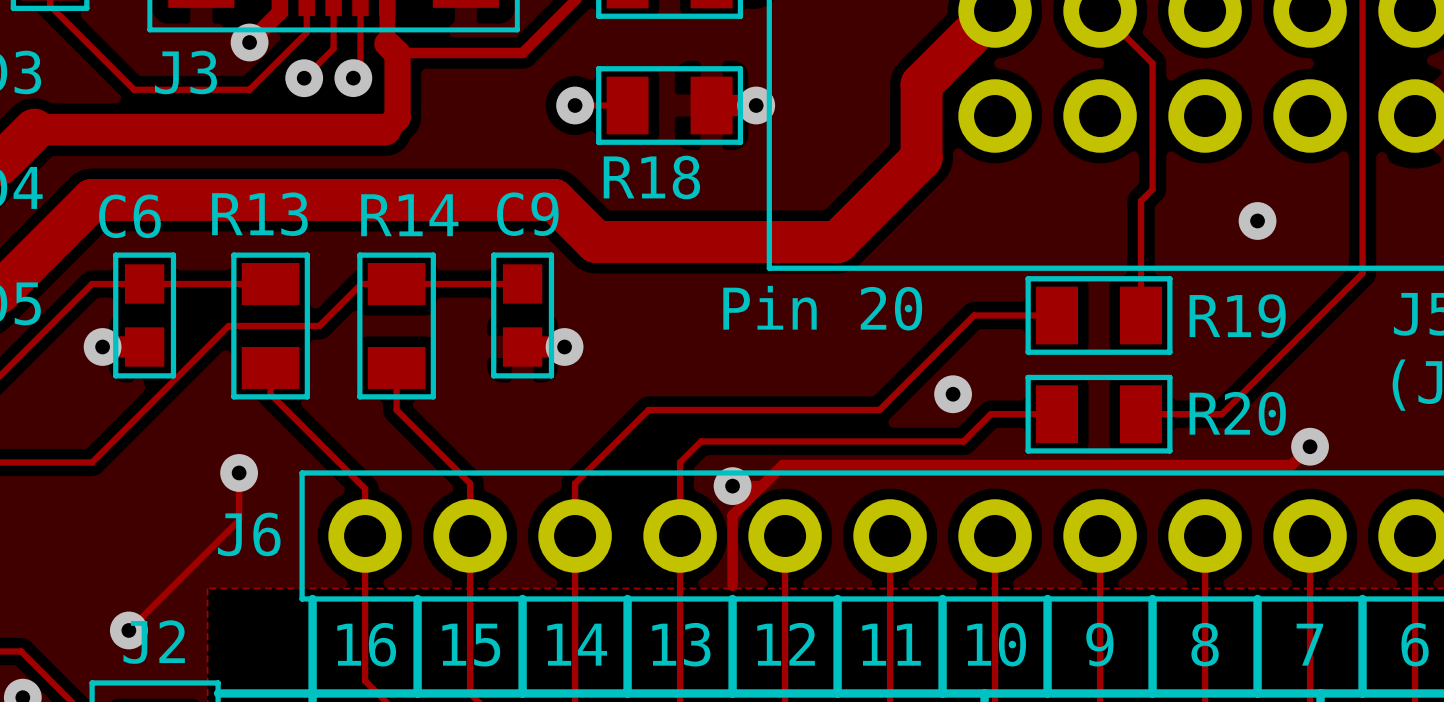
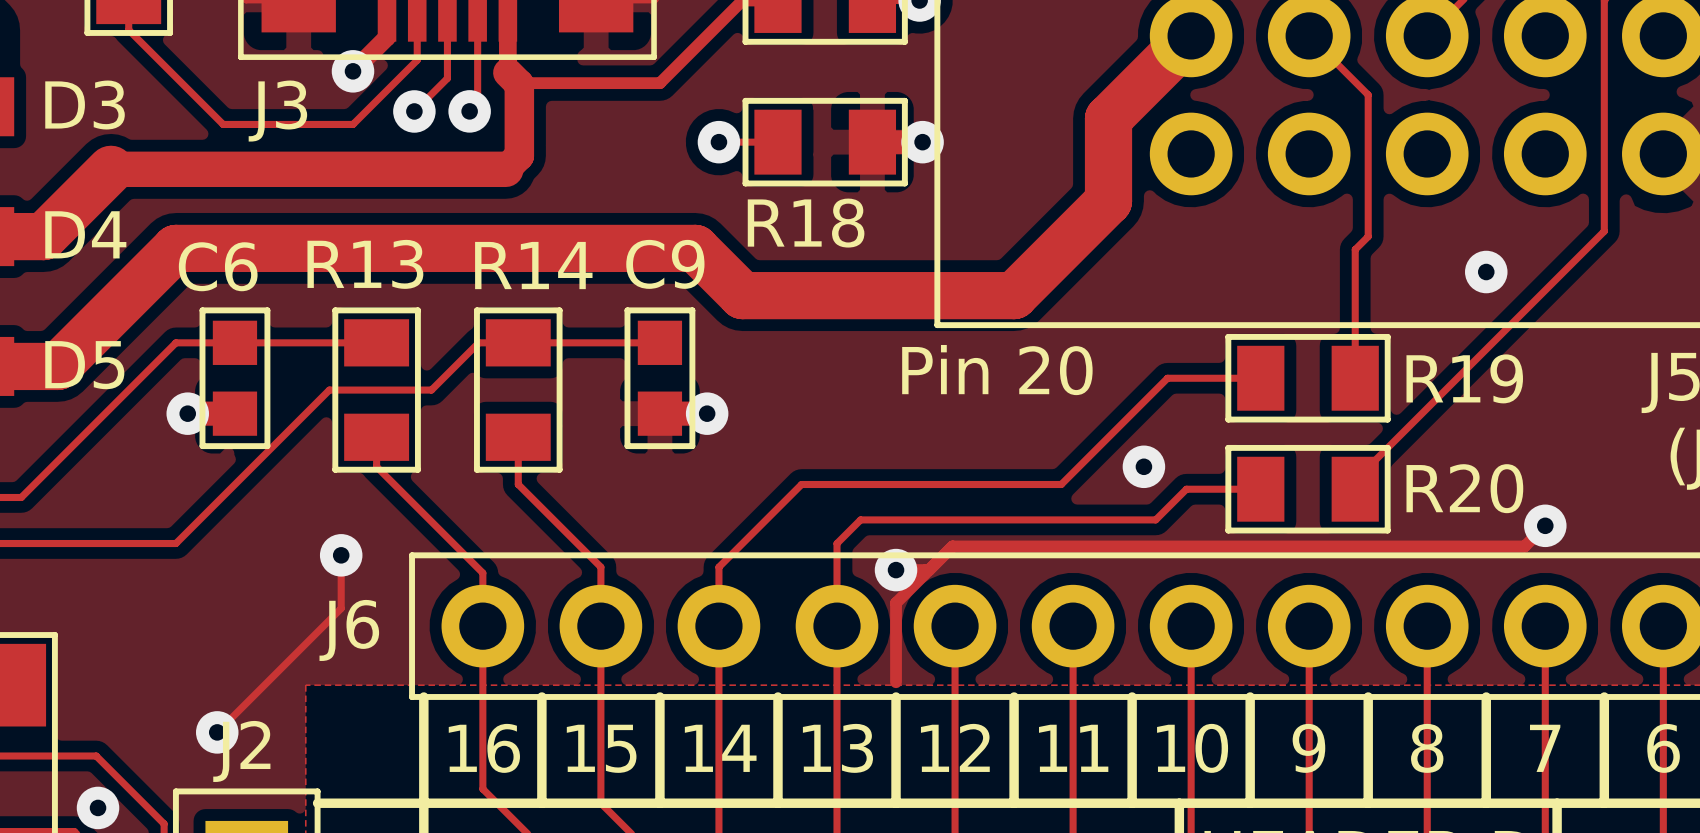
track: (1362, 184) (1362, 273) (1221, 414) (1141, 414) -> (1604, 231) (1355, 480) (1355, 489)

